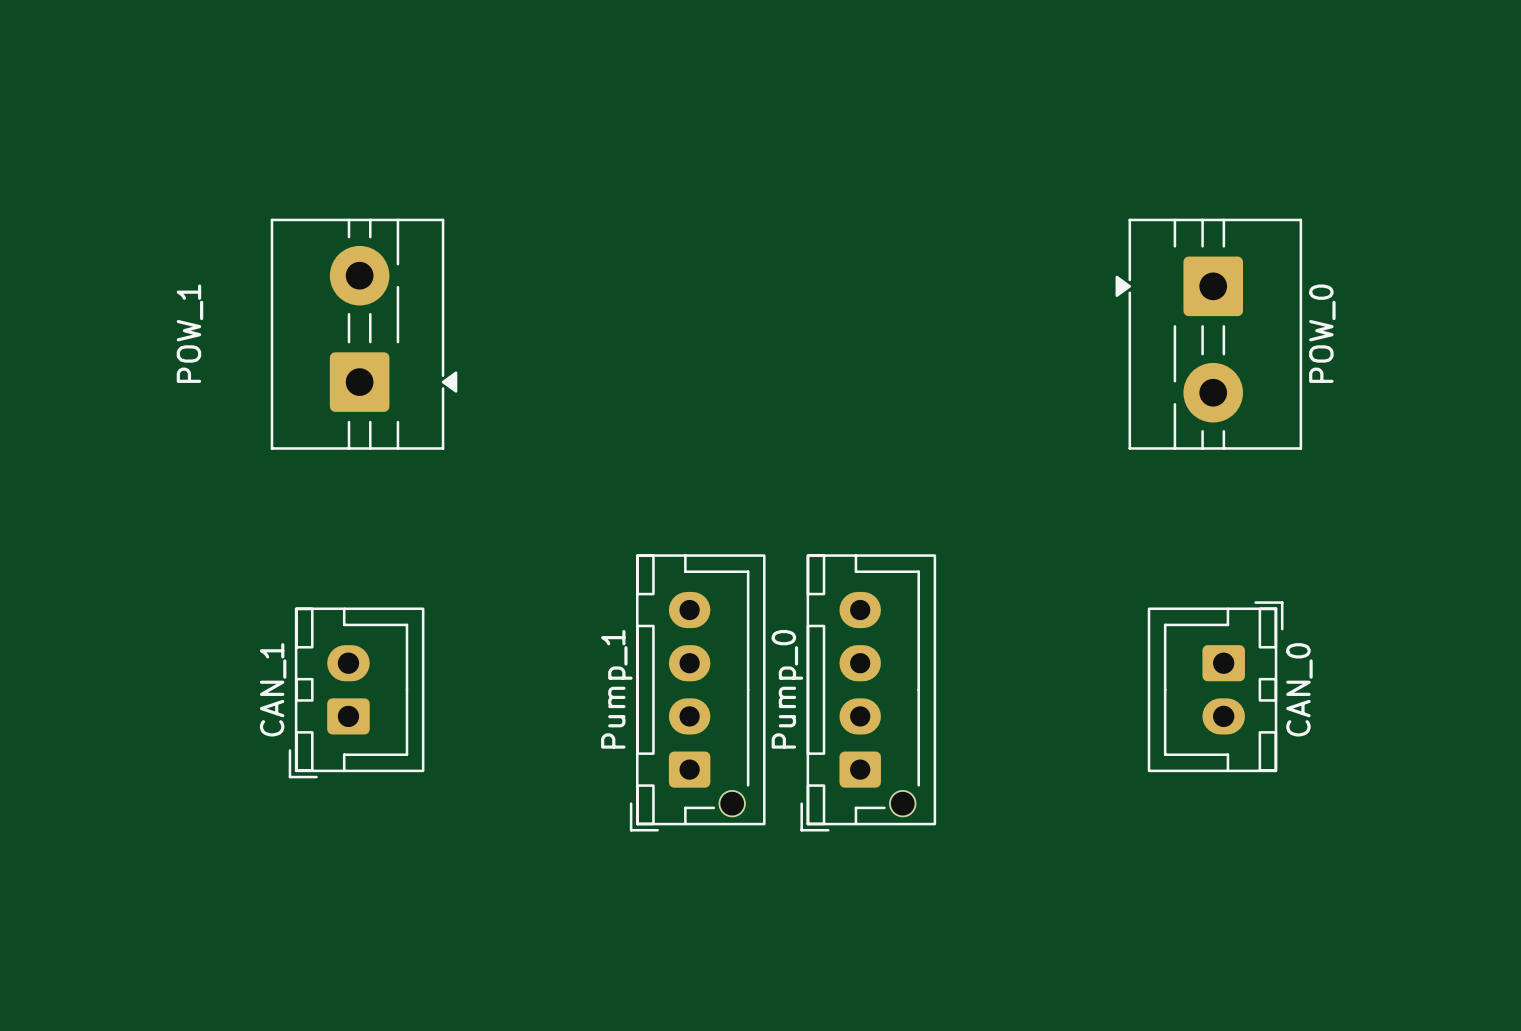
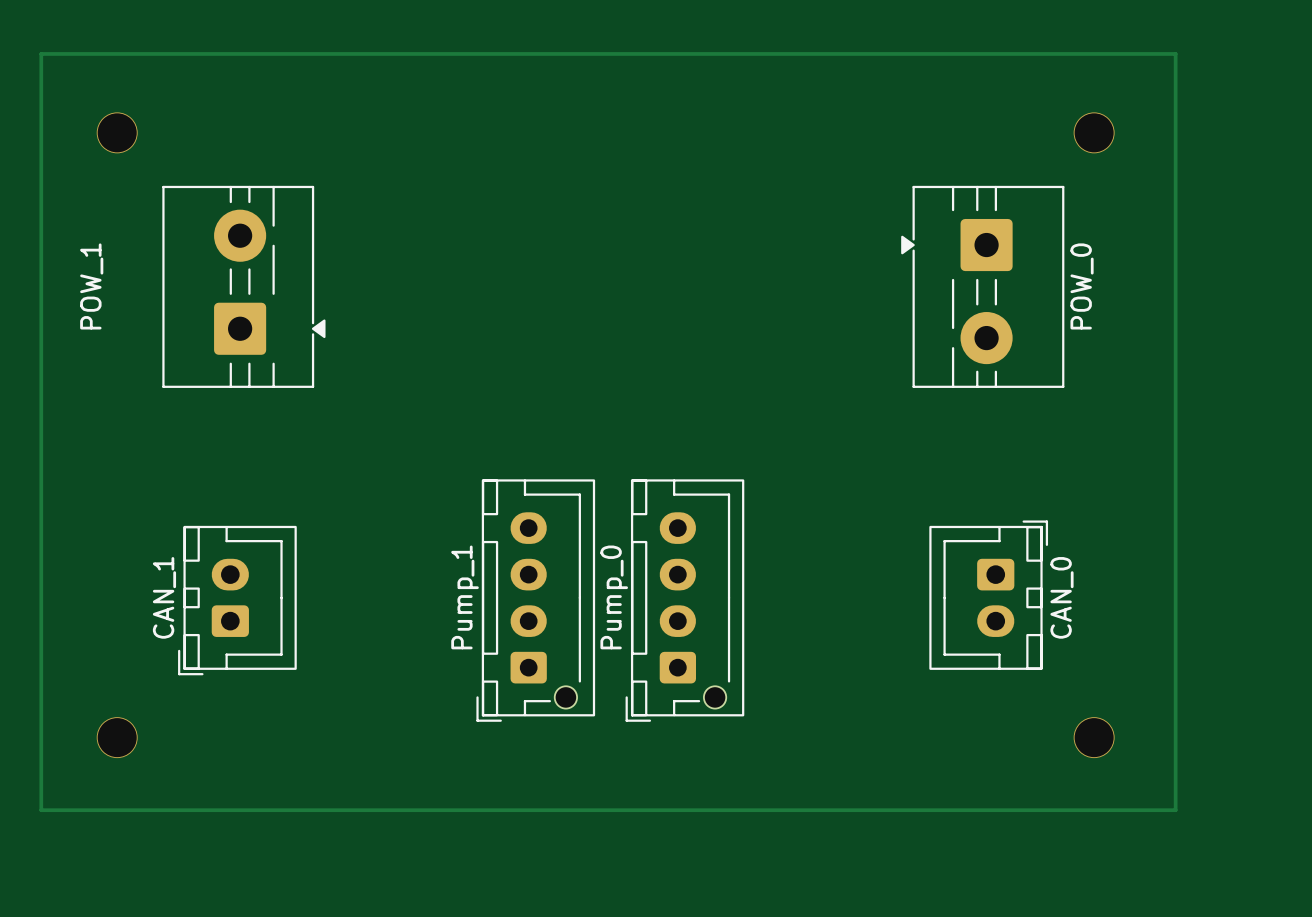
track: none -> (41, 53) (1175, 53) (1175, 810) (41, 810) (41, 53)
via: none -> (117, 132)
via: none -> (1094, 132)
via: none -> (117, 737)
via: none -> (1094, 737)

